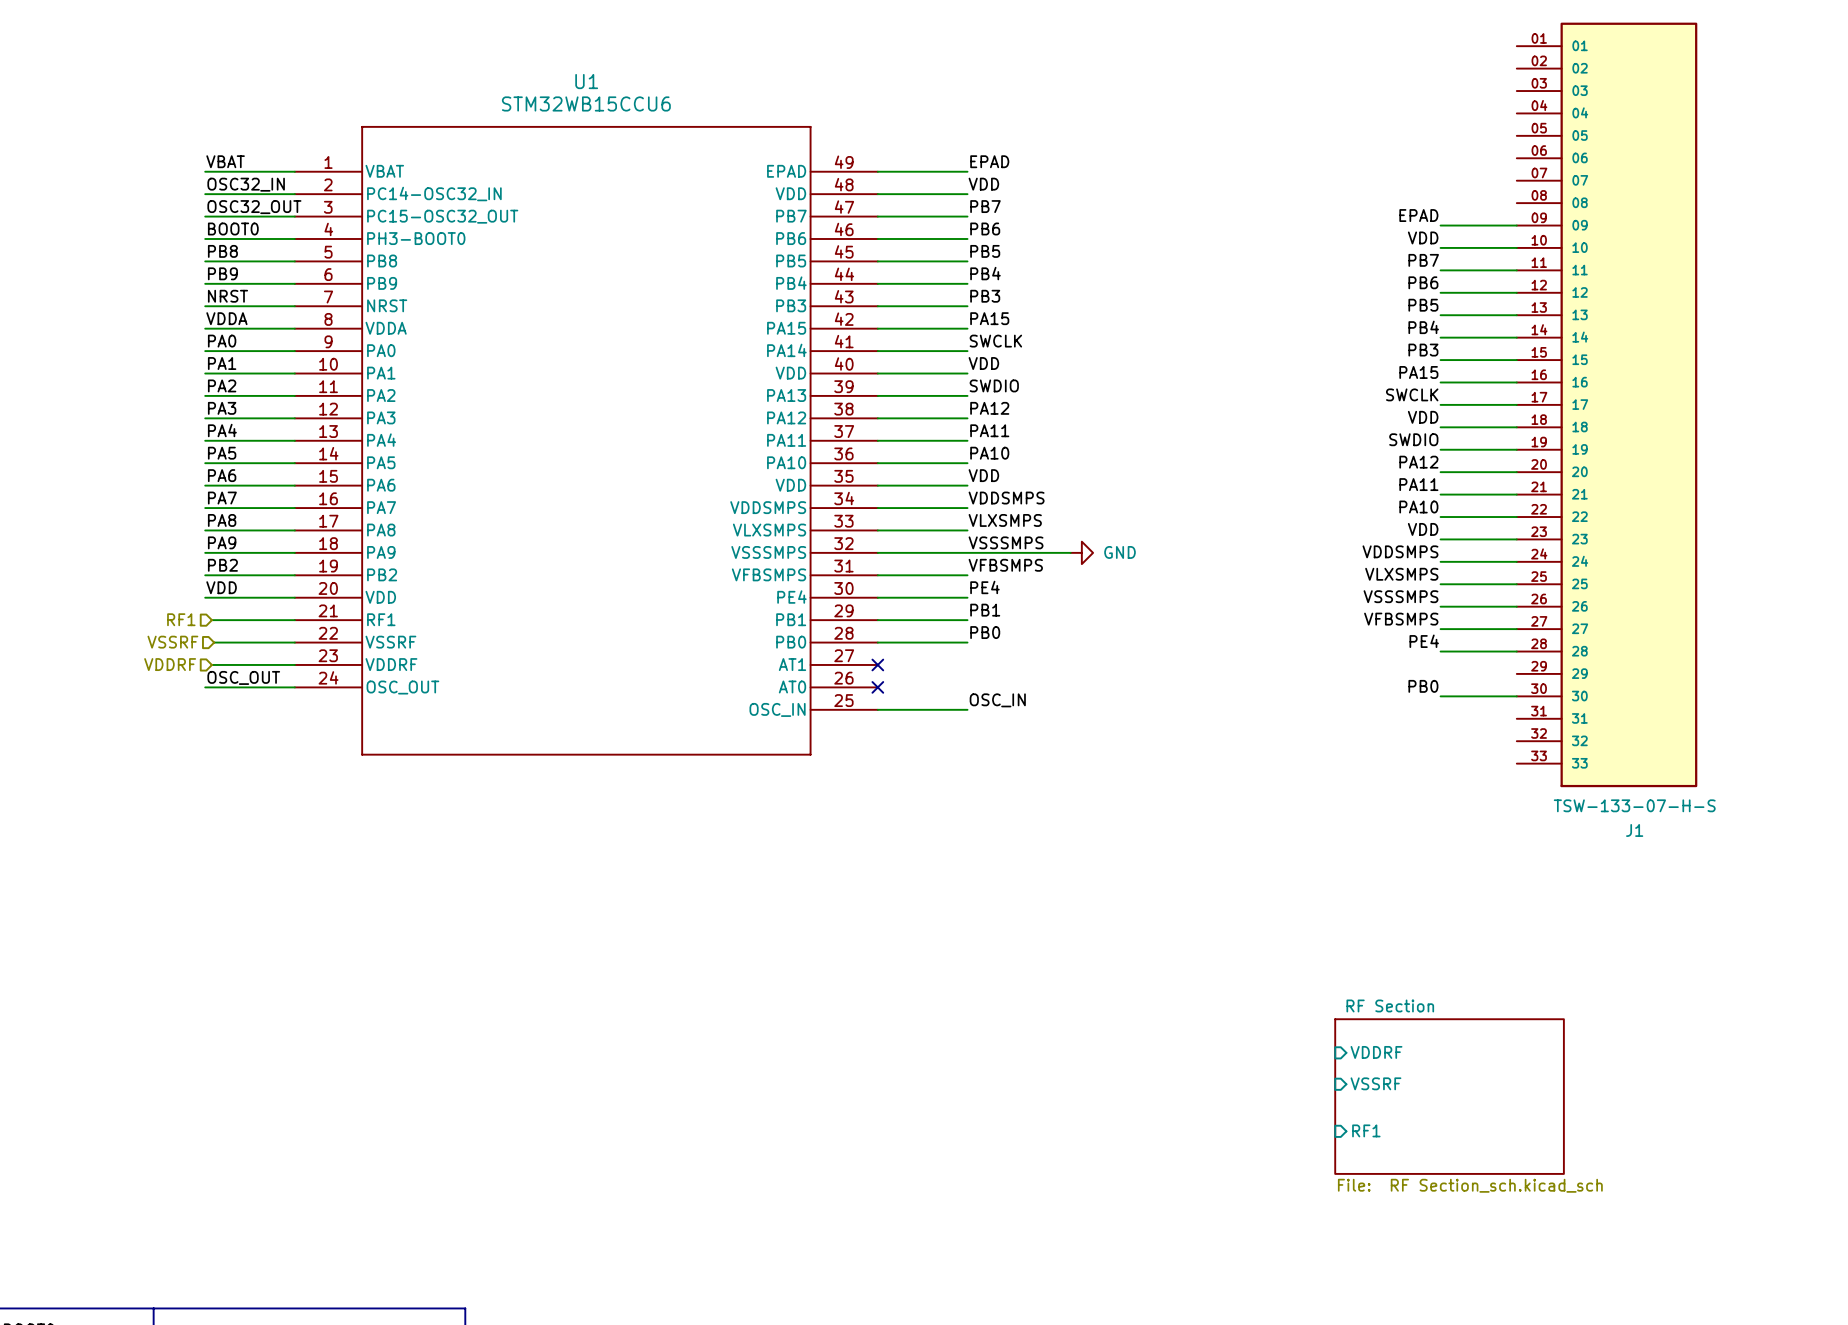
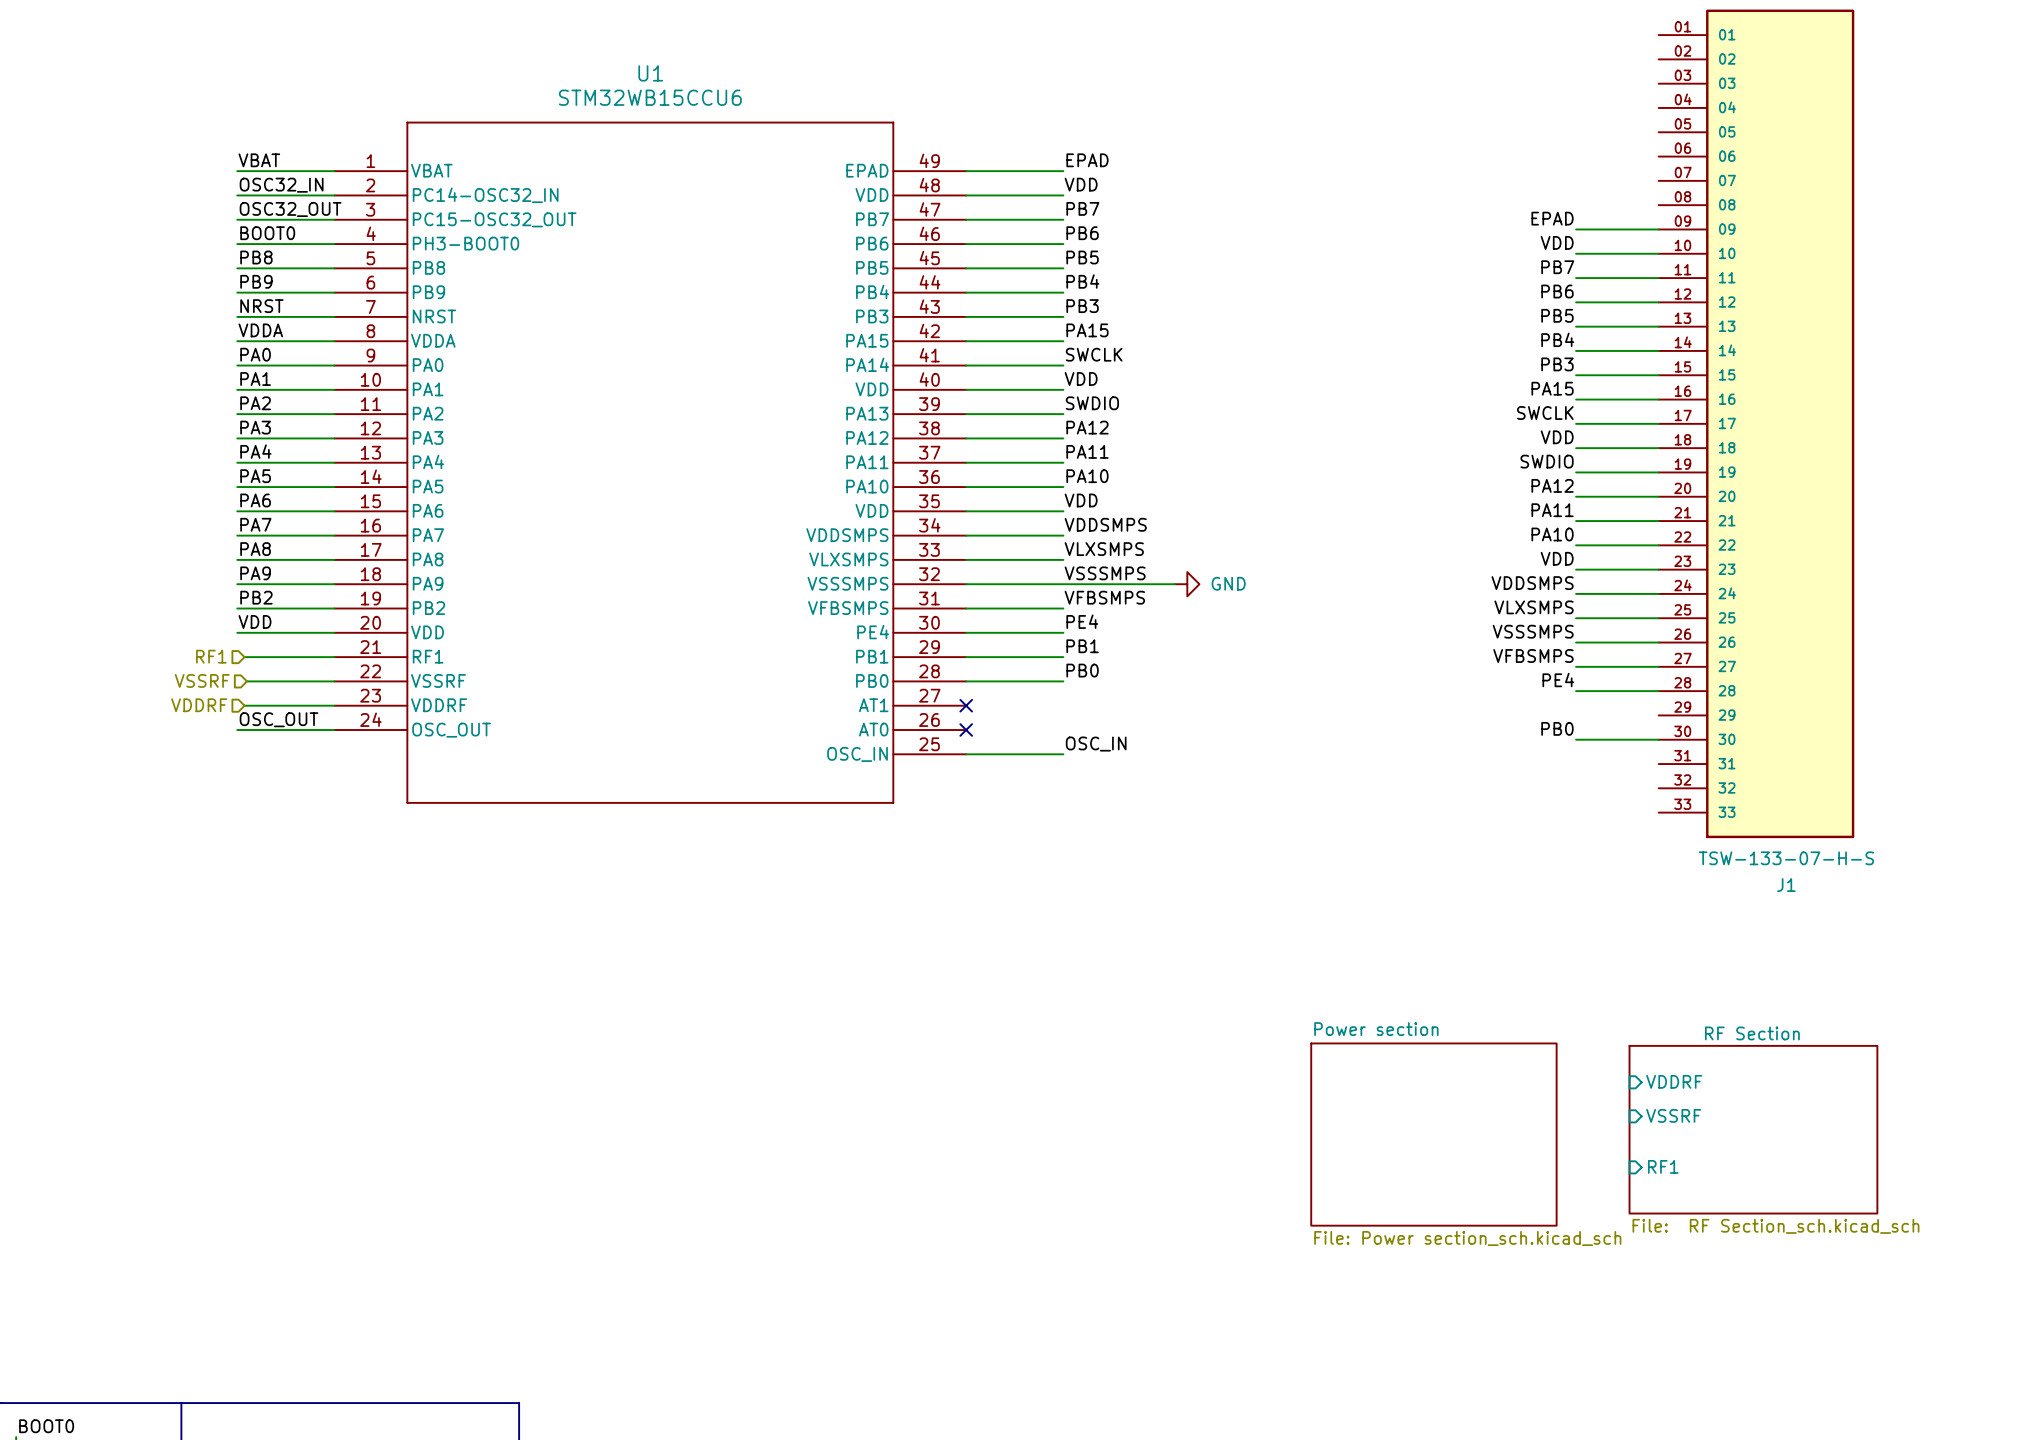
sheet RF Section name position: RF Section (1390, 1005) -> RF Section (1752, 1033)
sheet pin position: VDDRF (1376, 1052) -> VDDRF (1674, 1081)
sheet Power section: none -> File: Power section_sch.kicad_sch (1433, 1134)
sheet pin position: VSSRF (1375, 1083) -> VSSRF (1673, 1115)
sheet RF Section position: (1449, 1096) -> (1753, 1129)
sheet pin position: RF1 (1366, 1130) -> RF1 (1663, 1166)

